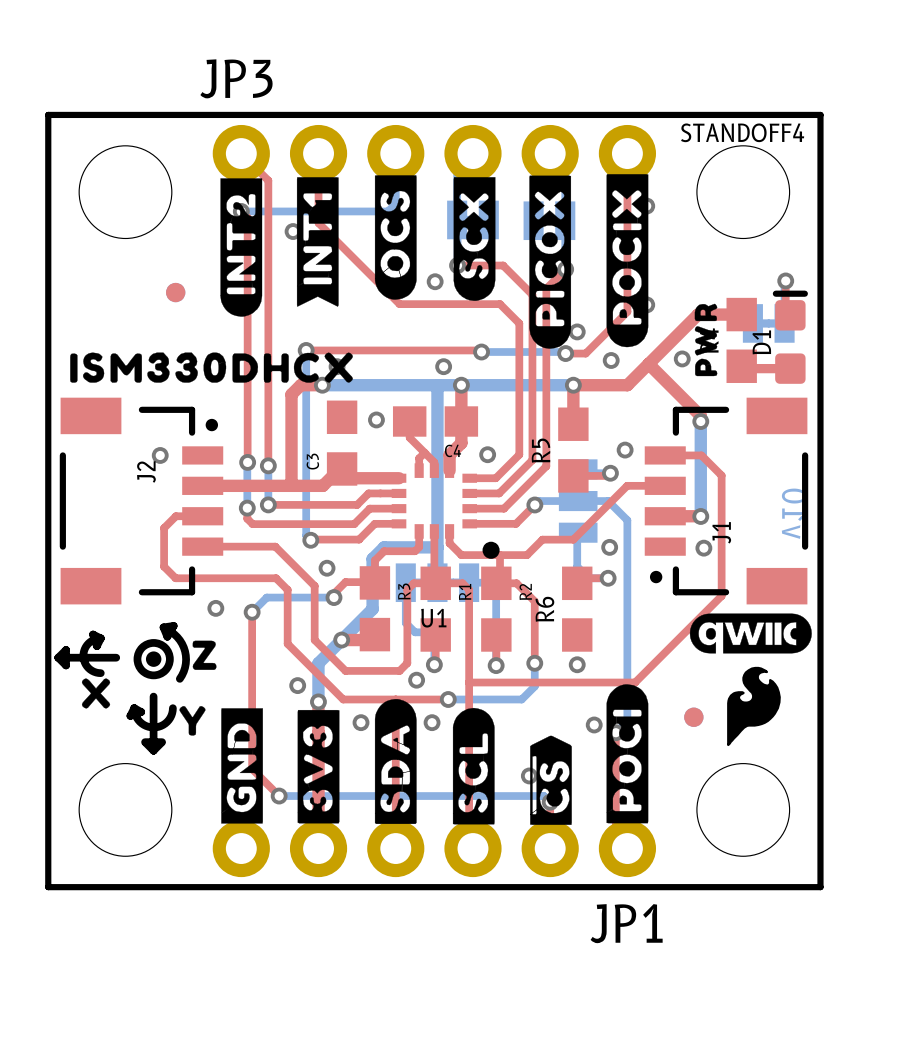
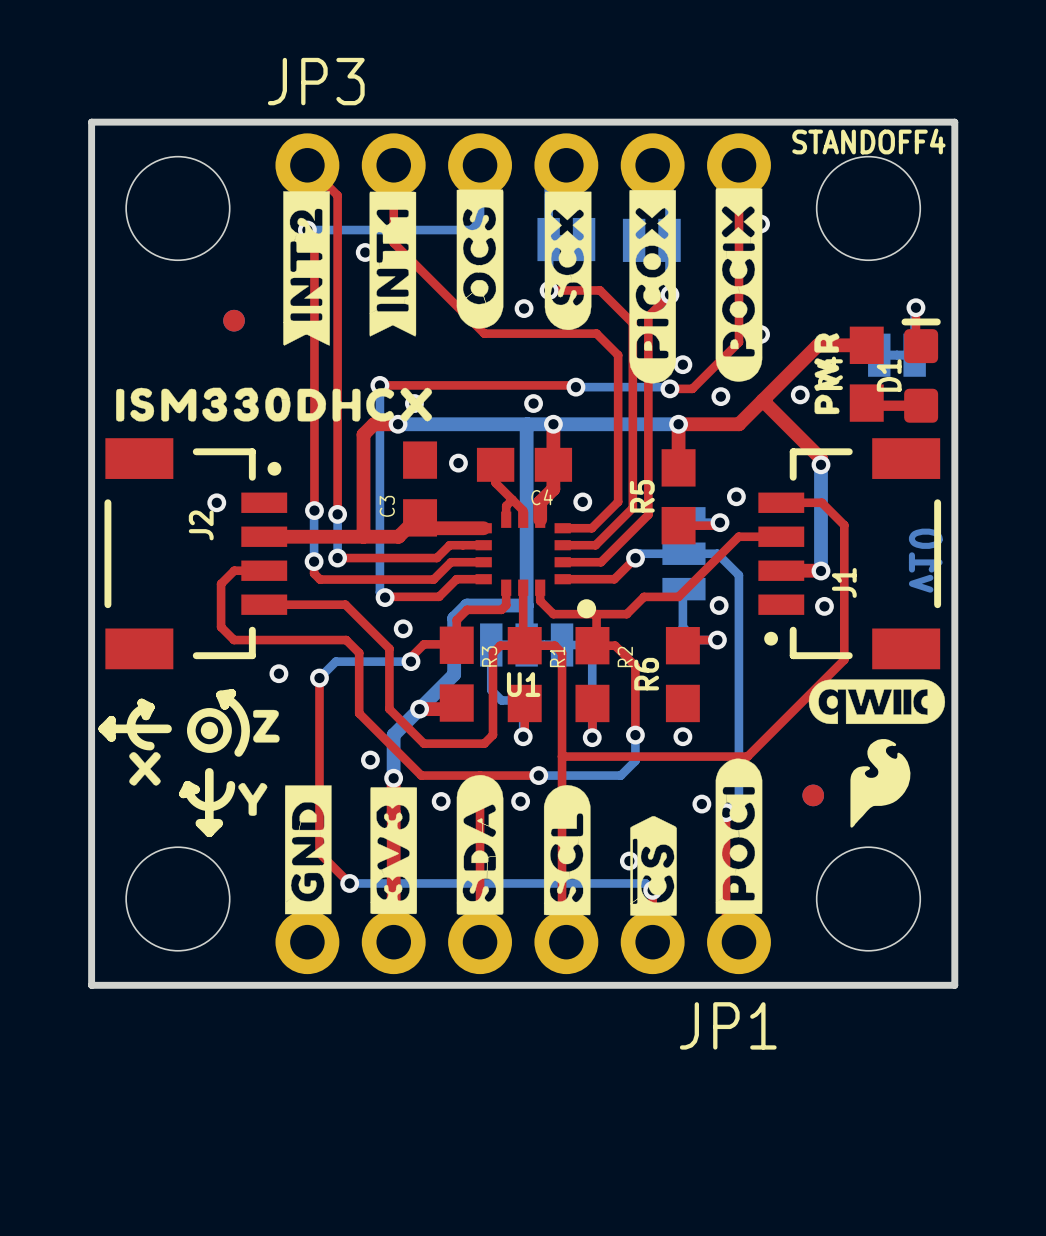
drawing shape: [220, 178, 263, 317] -> [283, 191, 330, 346]
via: (416, 680) -> none

